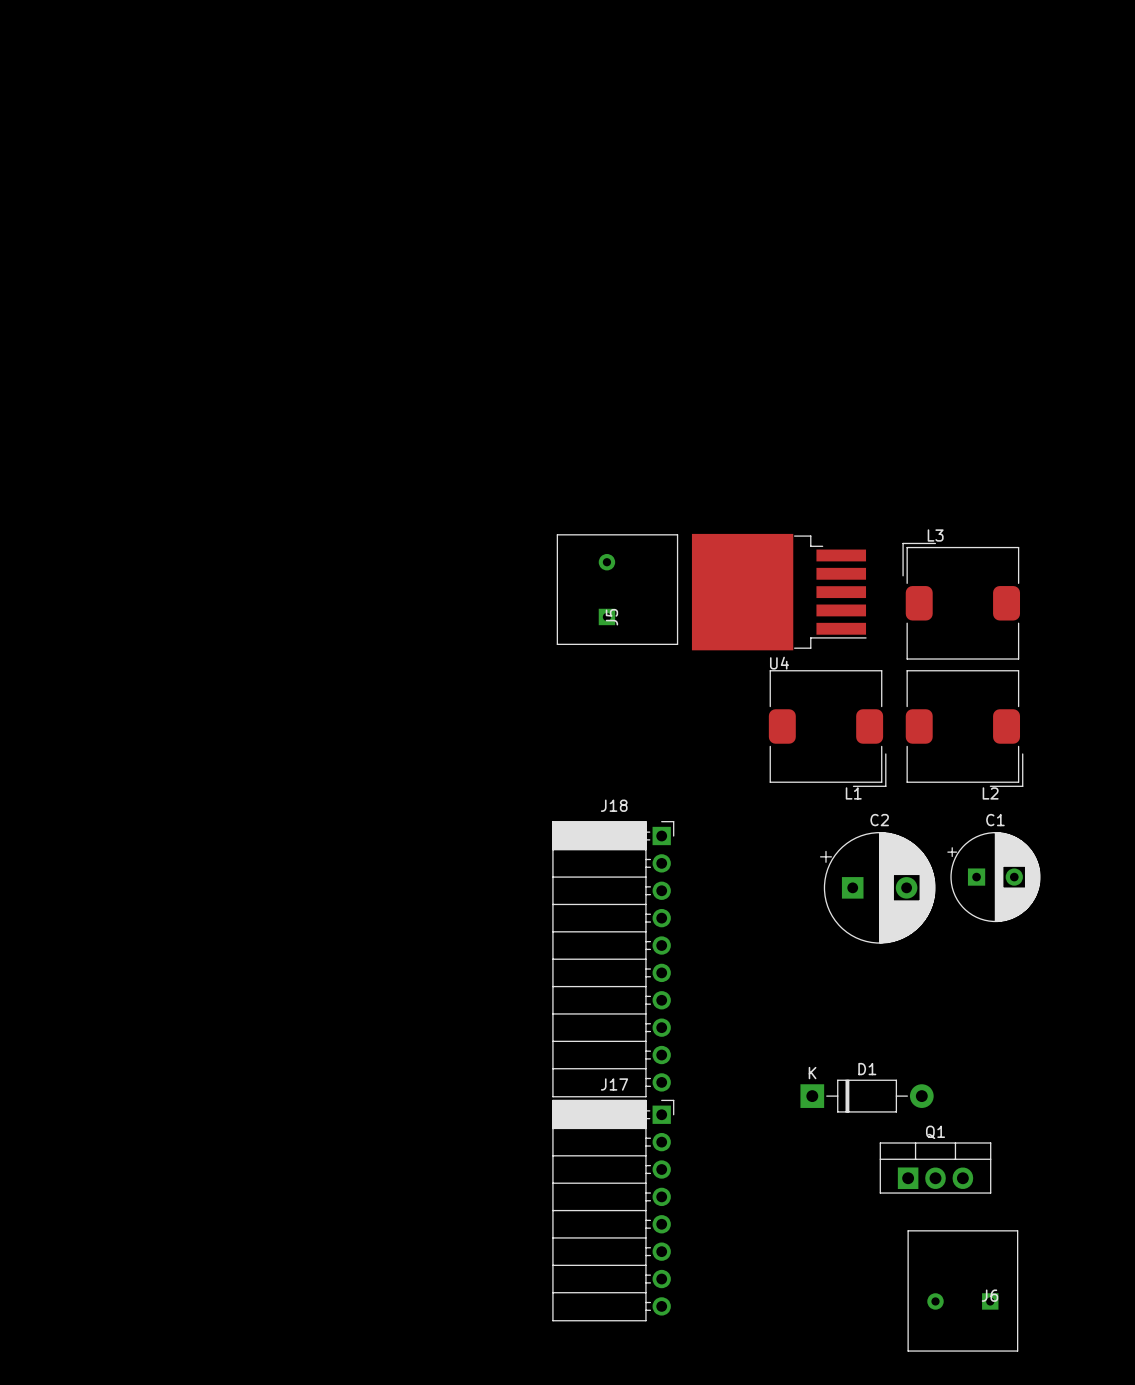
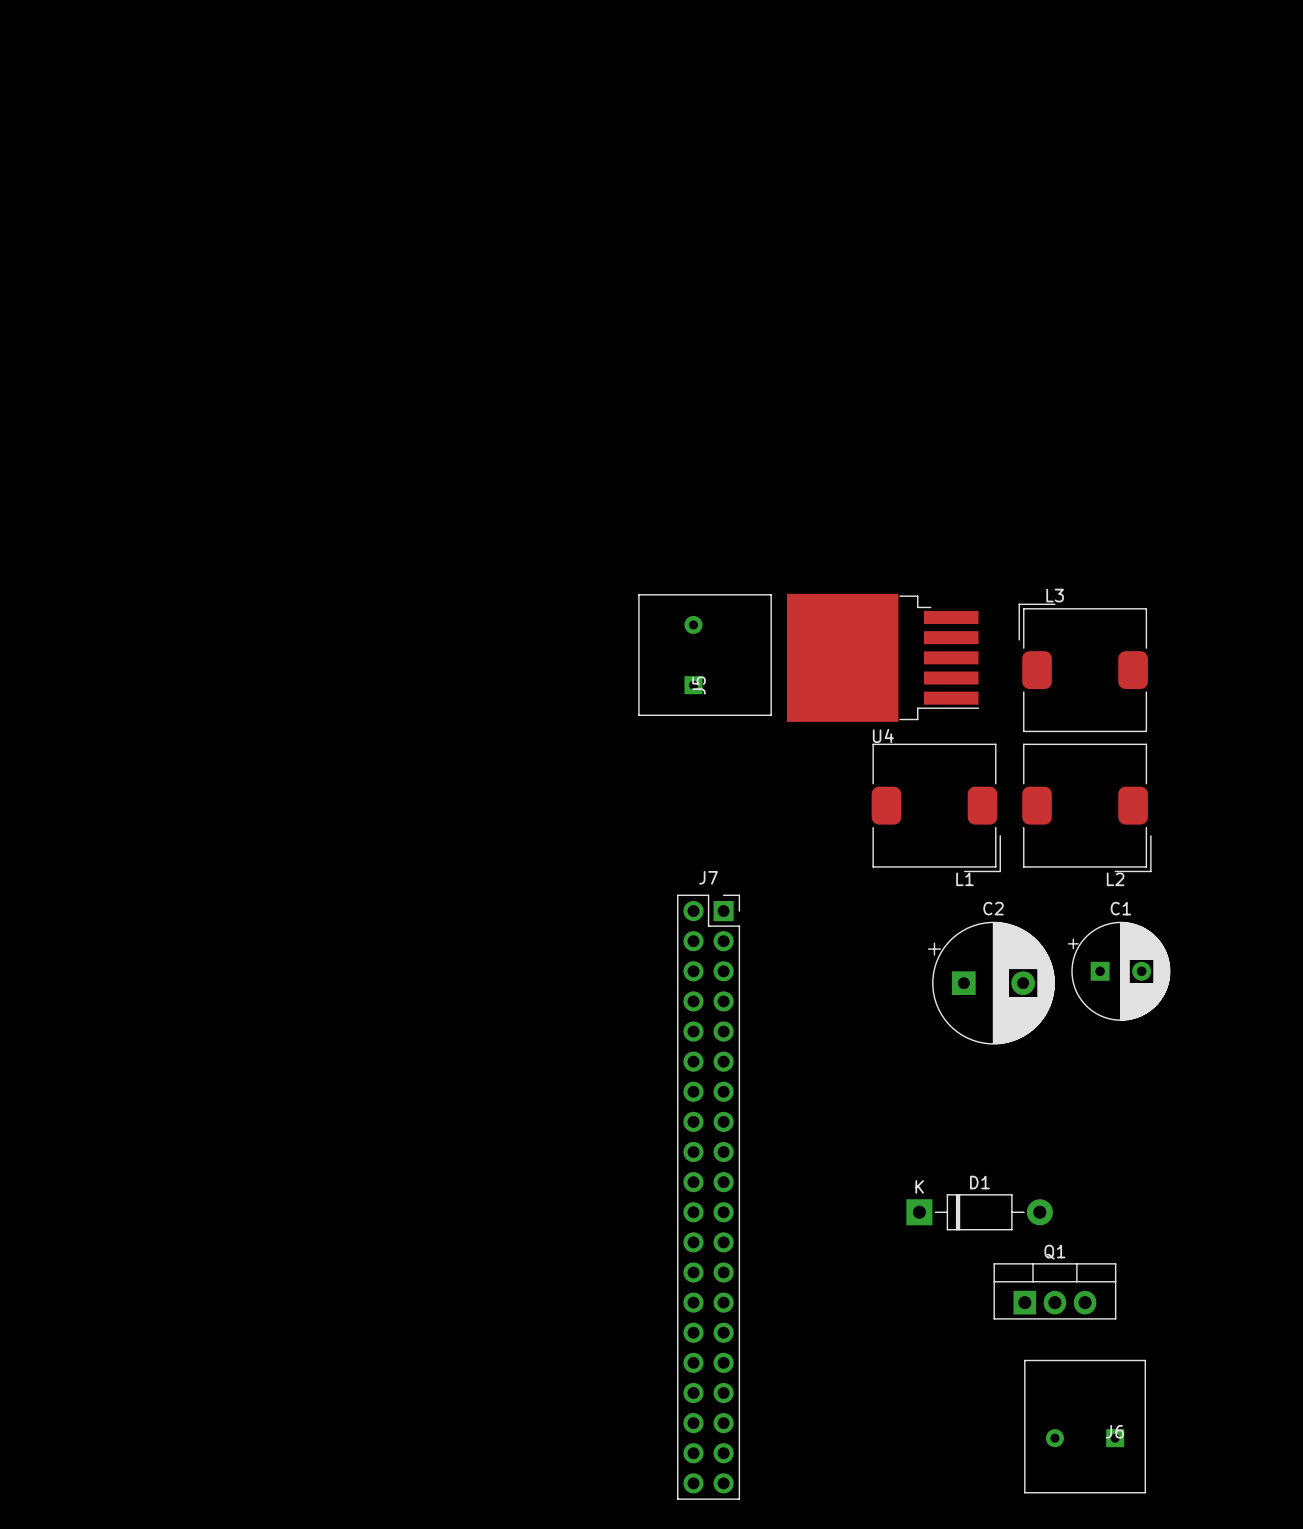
J18: (613, 959) -> none
J7: none -> (708, 1197)
J17: (613, 1210) -> none

